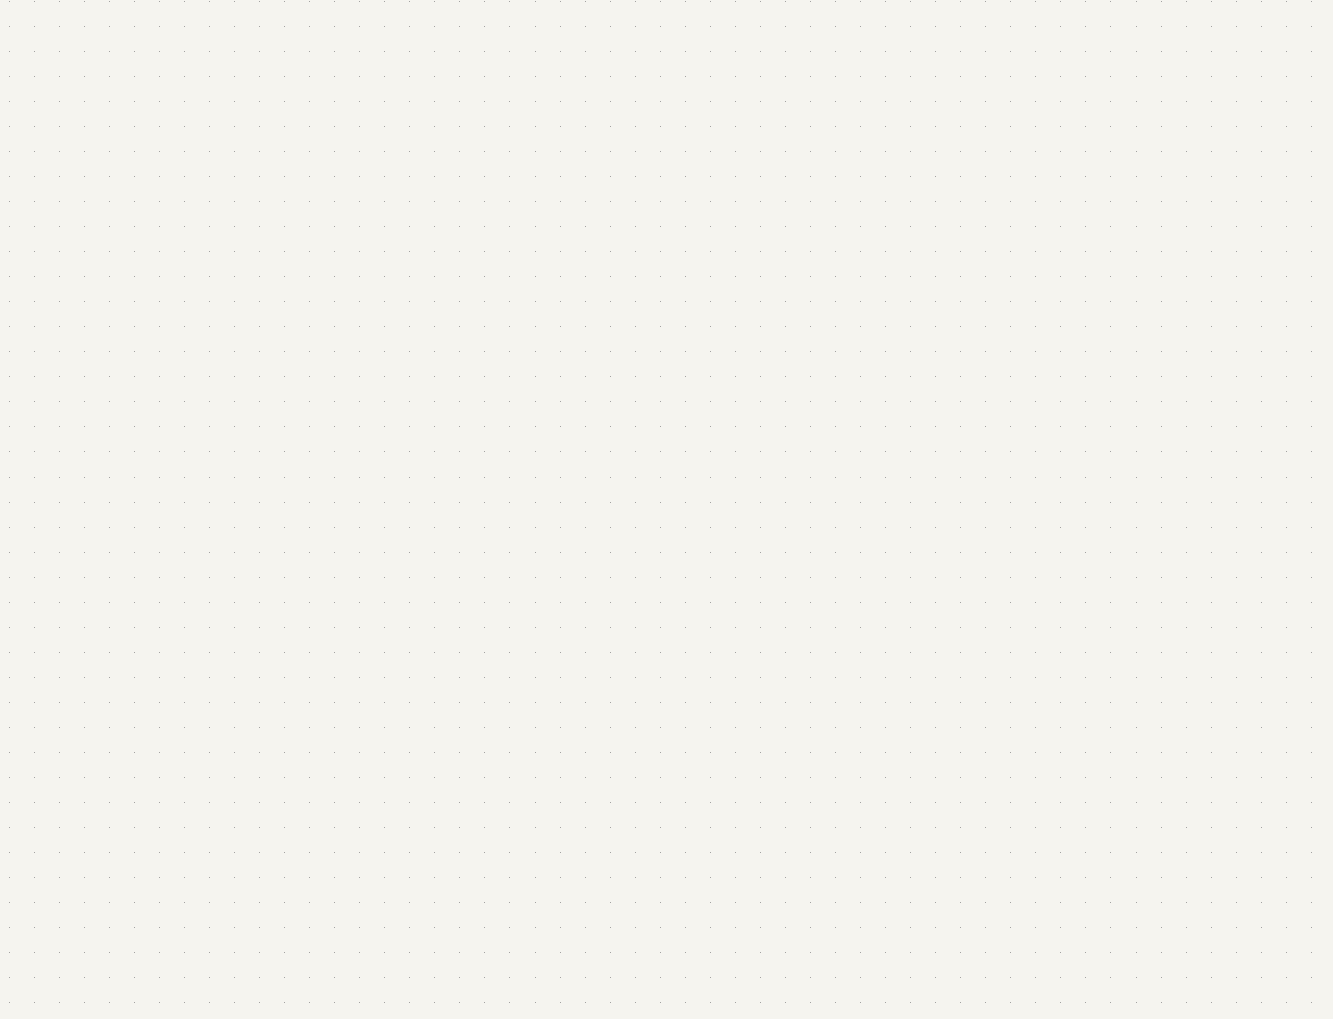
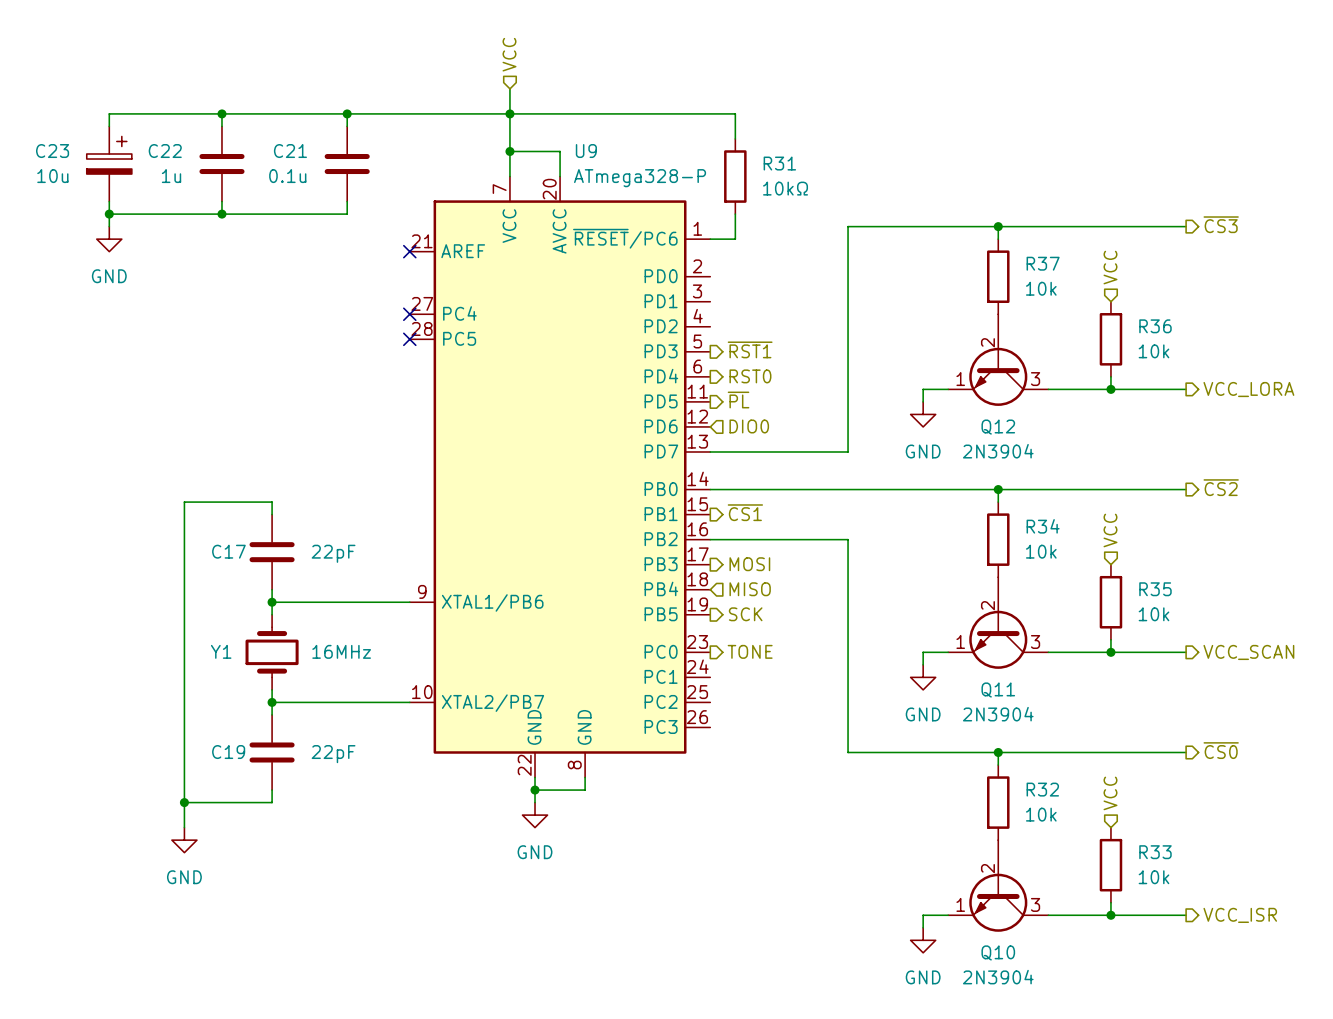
hierarchical label: none -> VCC (509, 54)
wire: none -> (509, 88) (509, 176)
wire: none -> (221, 113) (221, 126)
junction: none -> (221, 113)
wire: none -> (347, 113) (347, 126)
junction: none -> (347, 113)
junction: none -> (509, 113)
wire: none -> (109, 126) (109, 113) (735, 113) (735, 138)
wire: none -> (509, 151) (560, 151) (560, 176)
junction: none -> (509, 151)
C23: none -> 10u (109, 164)
C22: none -> 1u (221, 164)
C21: none -> 0.1u (347, 164)
R31: none -> 10kΩ (735, 176)
wire: none -> (109, 201) (109, 226)
wire: none -> (221, 201) (221, 214)
wire: none -> (347, 201) (347, 214) (109, 214)
junction: none -> (109, 214)
junction: none -> (221, 214)
wire: none -> (735, 214) (735, 239) (710, 239)
hierarchical label: none -> ~{CS3} (1221, 224)
wire: none -> (998, 226) (998, 239)
junction: none -> (998, 226)
wire: none -> (1186, 226) (848, 226) (848, 451) (710, 451)
power symbol: none -> GND (109, 239)
no-connect mark: none -> (409, 251)
hierarchical label: none -> VCC (1110, 267)
R37: none -> 10k (998, 276)
no-connect mark: none -> (409, 314)
no-connect mark: none -> (409, 339)
R36: none -> 10k (1110, 339)
hierarchical label: none -> ~{RST1} (750, 349)
Q12: none -> 2N3904 (998, 360)
hierarchical label: none -> RST0 (750, 376)
wire: none -> (1110, 376) (1110, 389)
wire: none -> (948, 389) (923, 389) (923, 401)
wire: none -> (1048, 389) (1186, 389)
junction: none -> (1110, 389)
hierarchical label: none -> VCC_LORA (1248, 389)
hierarchical label: none -> ~{PL} (738, 400)
power symbol: none -> GND (923, 414)
hierarchical label: none -> DIO0 (749, 426)
U9: none -> ATmega328-P (560, 477)
hierarchical label: none -> ~{CS2} (1221, 487)
wire: none -> (710, 489) (1186, 489)
wire: none -> (998, 489) (998, 502)
junction: none -> (998, 489)
hierarchical label: none -> ~{CS1} (745, 512)
wire: none -> (272, 514) (272, 502) (184, 502) (184, 827)
hierarchical label: none -> VCC (1110, 530)
wire: none -> (710, 539) (848, 539) (848, 752) (1186, 752)
R34: none -> 10k (998, 539)
C17: none -> 22pF (272, 552)
hierarchical label: none -> MOSI (749, 564)
wire: none -> (272, 589) (272, 614)
hierarchical label: none -> MISO (750, 589)
wire: none -> (272, 602) (409, 602)
junction: none -> (272, 602)
R35: none -> 10k (1110, 602)
hierarchical label: none -> SCK (745, 614)
Q11: none -> 2N3904 (998, 623)
wire: none -> (1110, 639) (1110, 652)
hierarchical label: none -> TONE (750, 651)
Y1: none -> 16MHz (272, 652)
wire: none -> (948, 652) (923, 652) (923, 664)
wire: none -> (1048, 652) (1186, 652)
junction: none -> (1110, 652)
hierarchical label: none -> VCC_SCAN (1248, 652)
power symbol: none -> GND (923, 677)
wire: none -> (272, 689) (272, 714)
wire: none -> (272, 702) (409, 702)
junction: none -> (272, 702)
hierarchical label: none -> ~{CS0} (1221, 750)
C19: none -> 22pF (272, 752)
wire: none -> (998, 752) (998, 765)
junction: none -> (998, 752)
wire: none -> (535, 777) (535, 802)
wire: none -> (585, 777) (585, 790) (535, 790)
wire: none -> (272, 790) (272, 802) (184, 802)
junction: none -> (535, 790)
hierarchical label: none -> VCC (1110, 793)
junction: none -> (184, 802)
R32: none -> 10k (998, 802)
power symbol: none -> GND (535, 815)
power symbol: none -> GND (184, 840)
R33: none -> 10k (1110, 865)
Q10: none -> 2N3904 (998, 885)
wire: none -> (1110, 902) (1110, 915)
wire: none -> (948, 915) (923, 915) (923, 927)
wire: none -> (1048, 915) (1186, 915)
junction: none -> (1110, 915)
hierarchical label: none -> VCC_ISR (1240, 915)
power symbol: none -> GND (923, 940)

